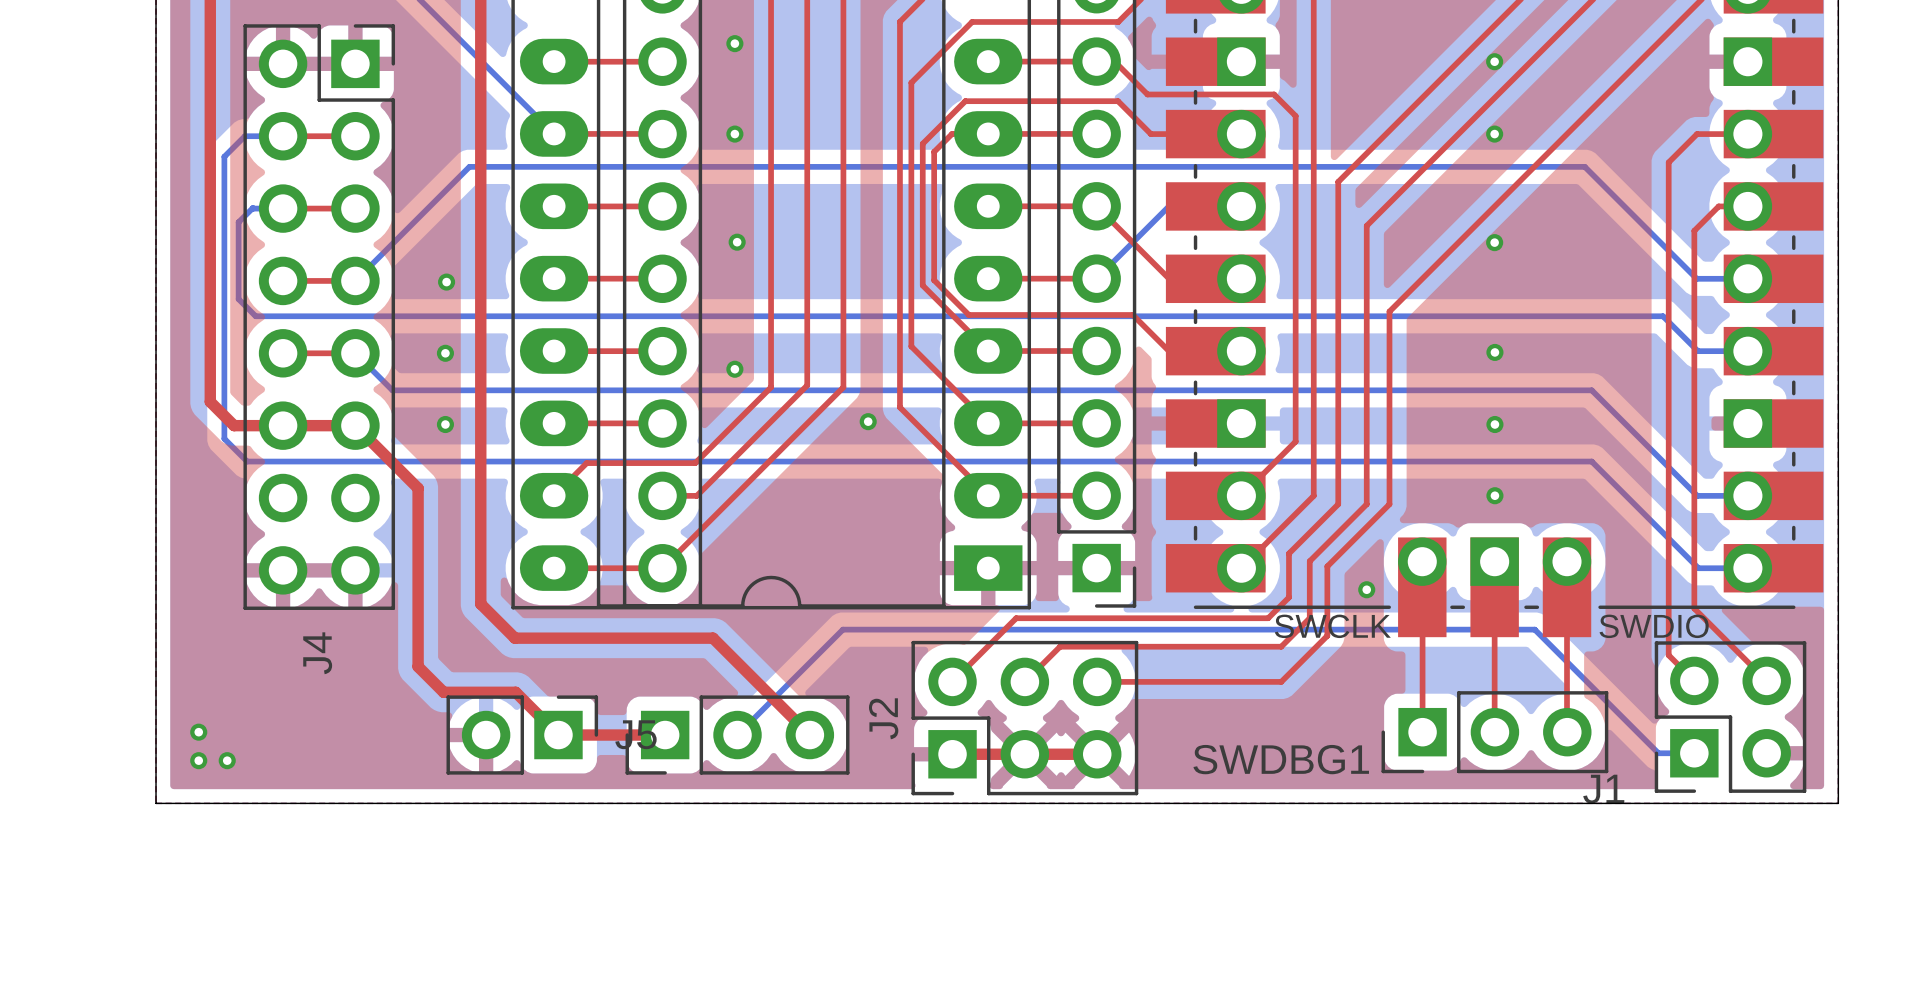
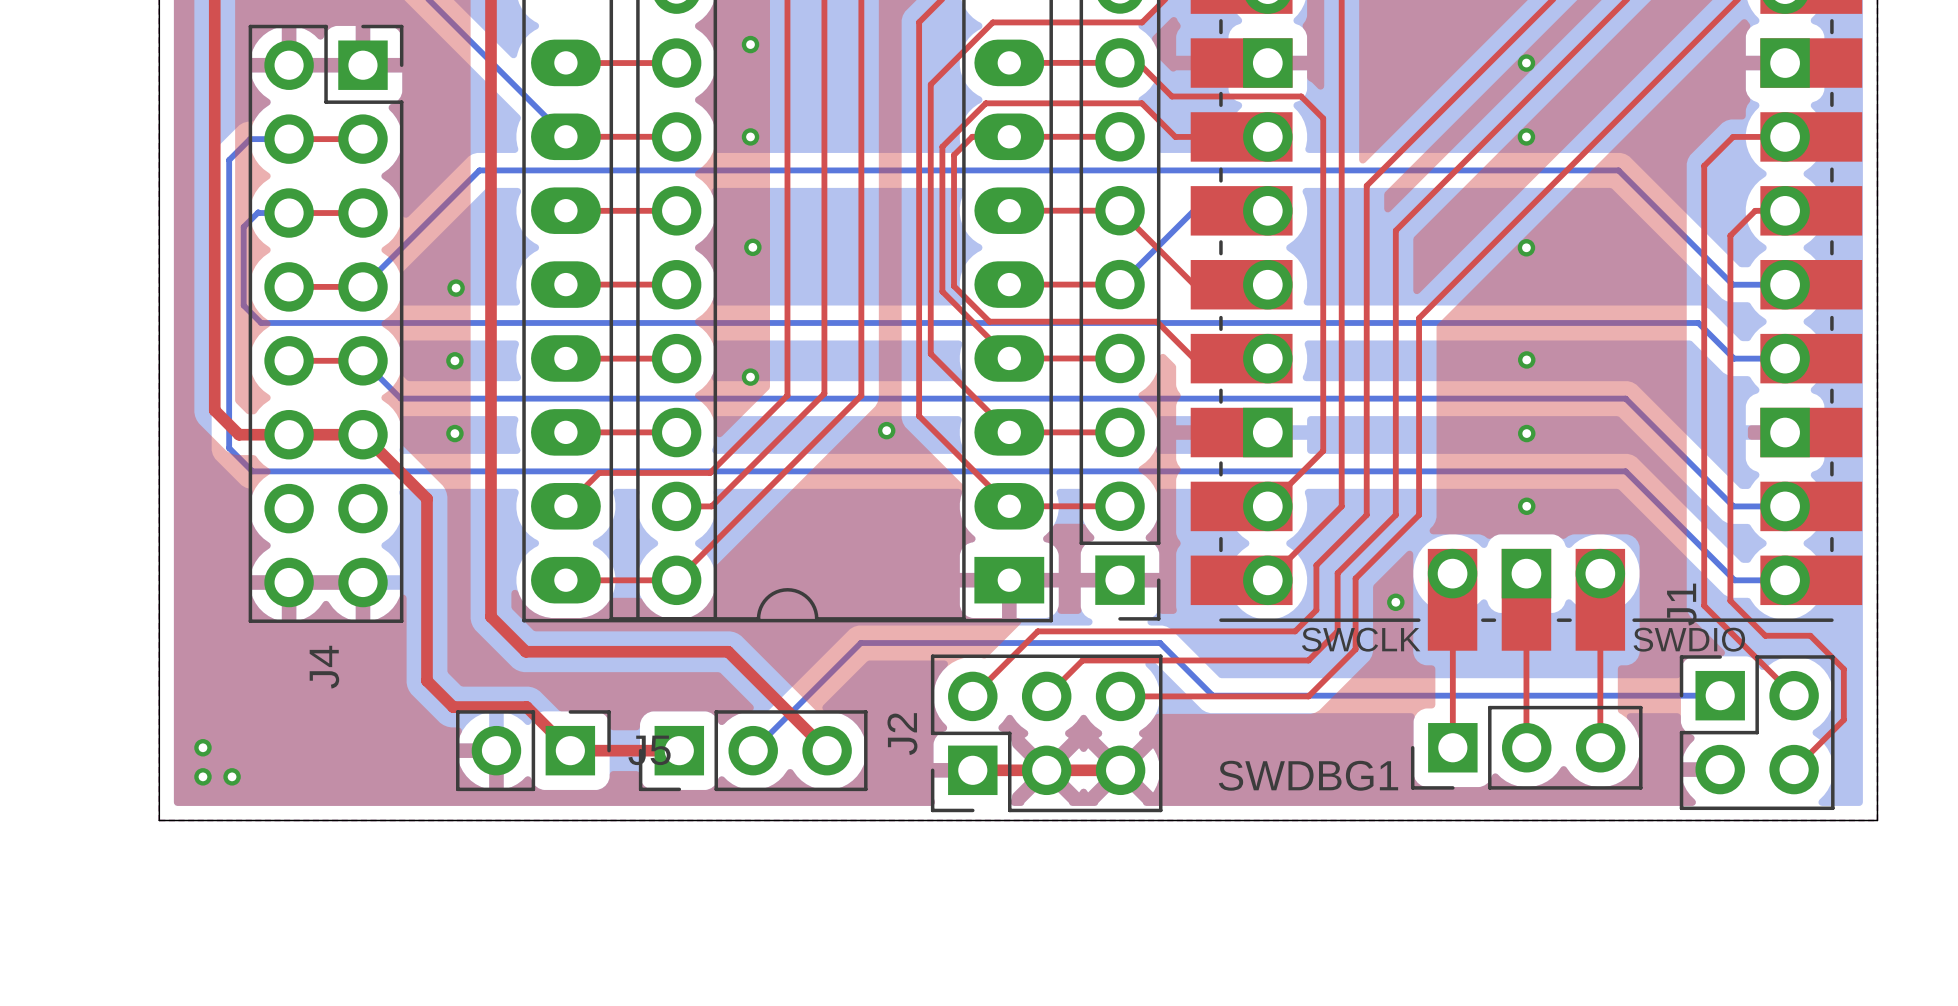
top track: (1694, 588) (1694, 608) (1766, 680) -> (1730, 600) (1765, 635) (1810, 635) (1843, 669) (1843, 719) (1794, 769)
top track: (1668, 593) (1668, 655) (1694, 680) -> (1704, 605) (1794, 695)
bottom track: (1135, 629) (1534, 629) (1658, 753) (1694, 753) -> (1160, 643) (1212, 695) (1720, 695)
J1 rotation: 0° (1730, 717) -> 90° clockwise (1757, 732)

